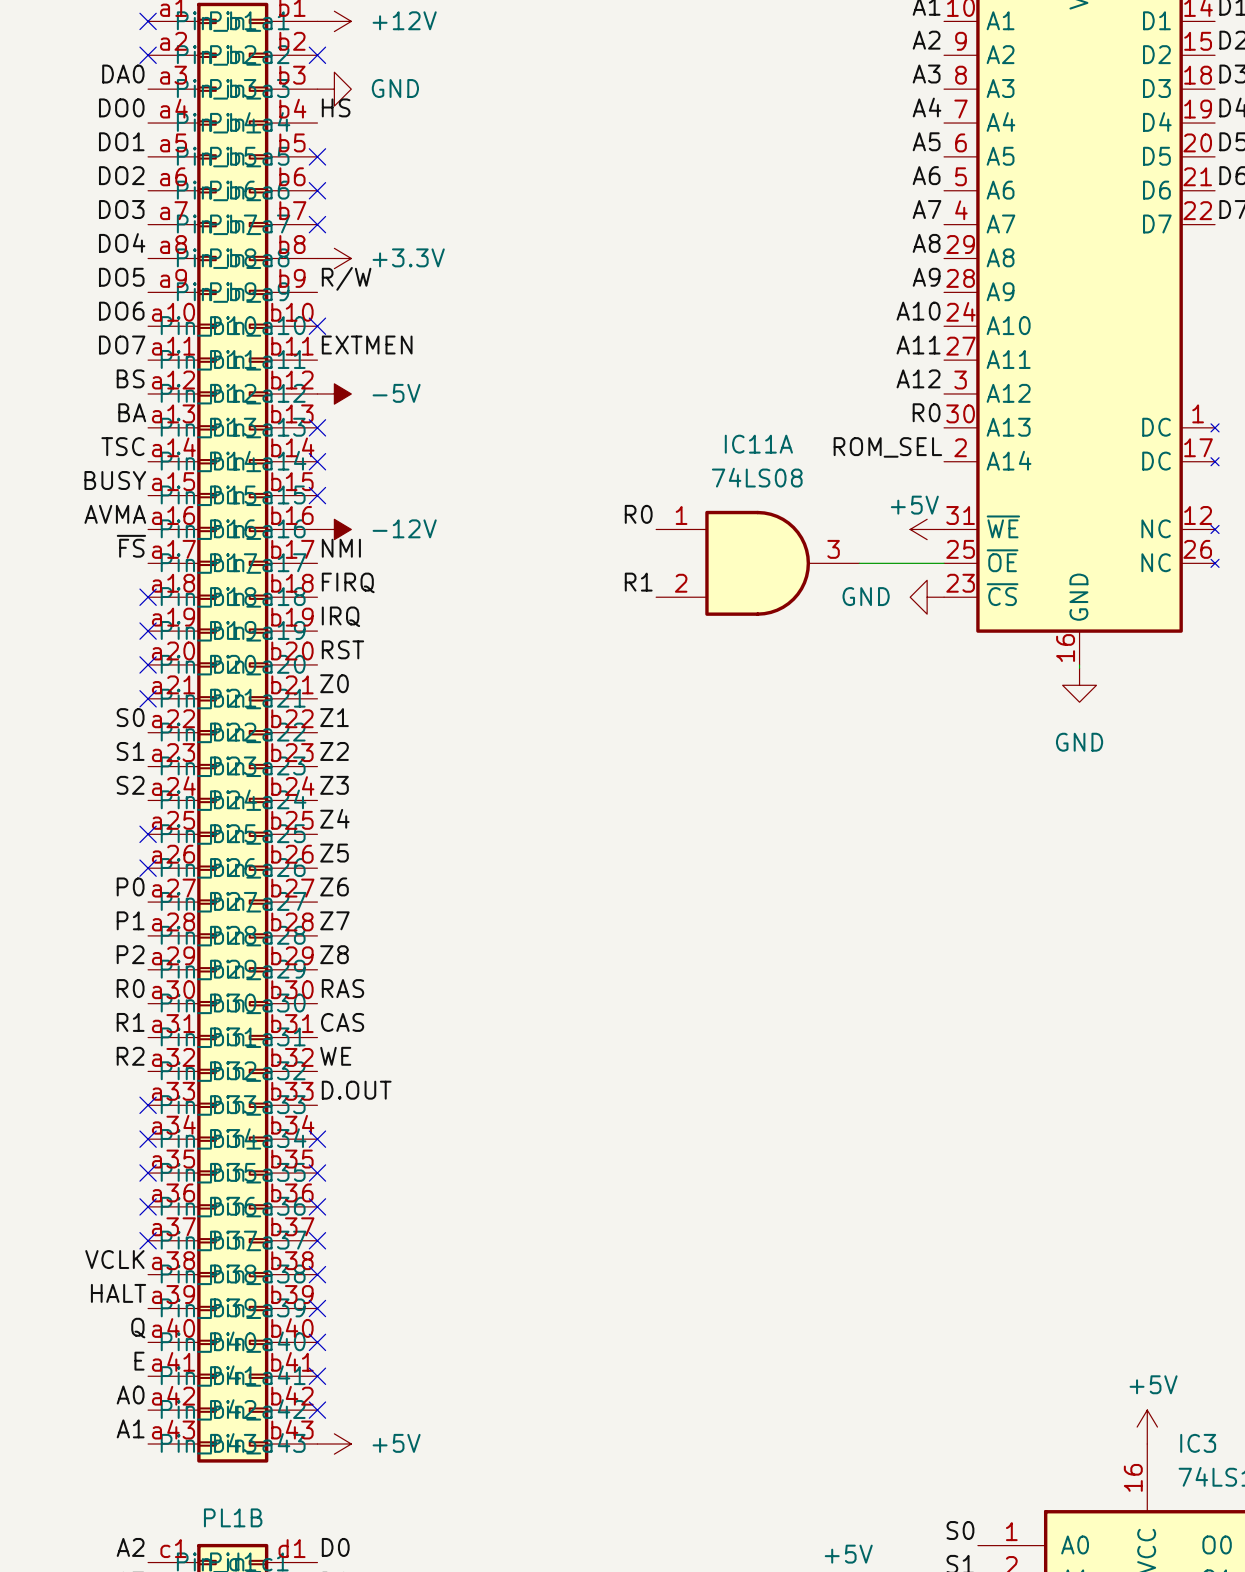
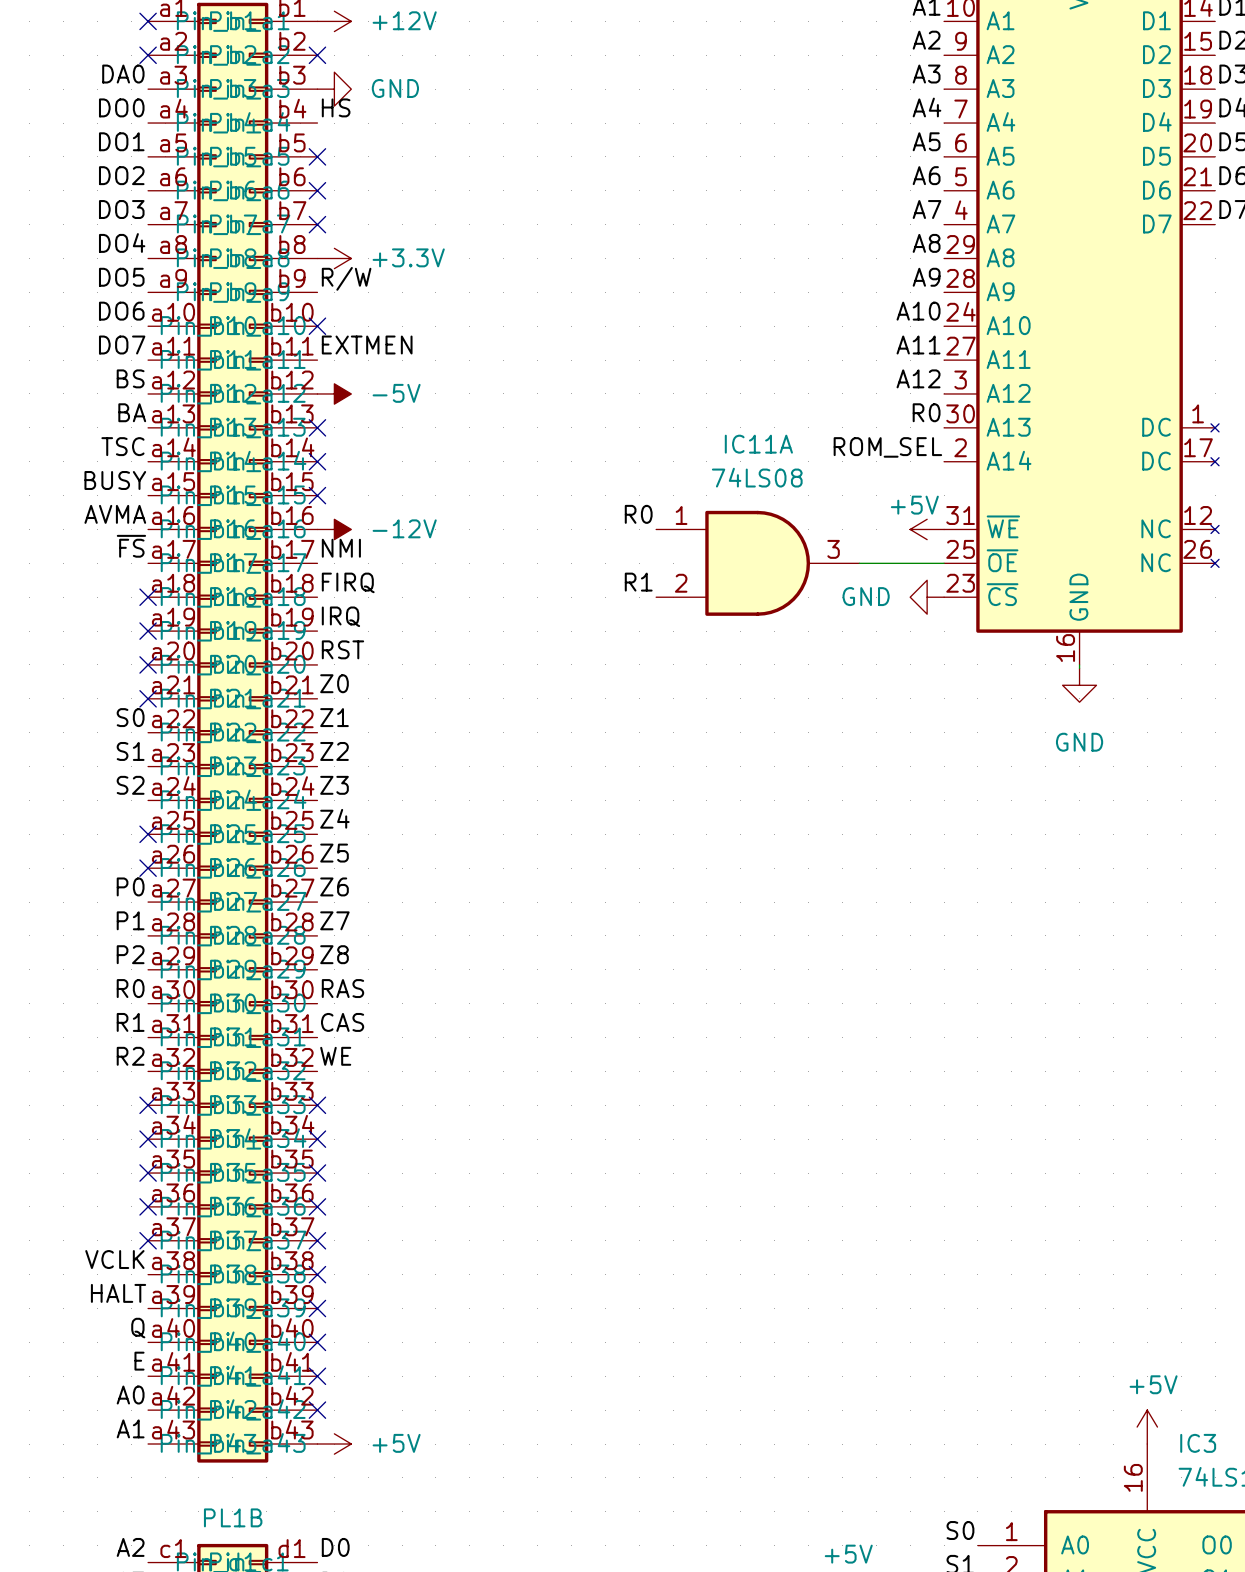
label: D.OUT (356, 1090) -> none
no-connect mark: none -> (317, 1105)

